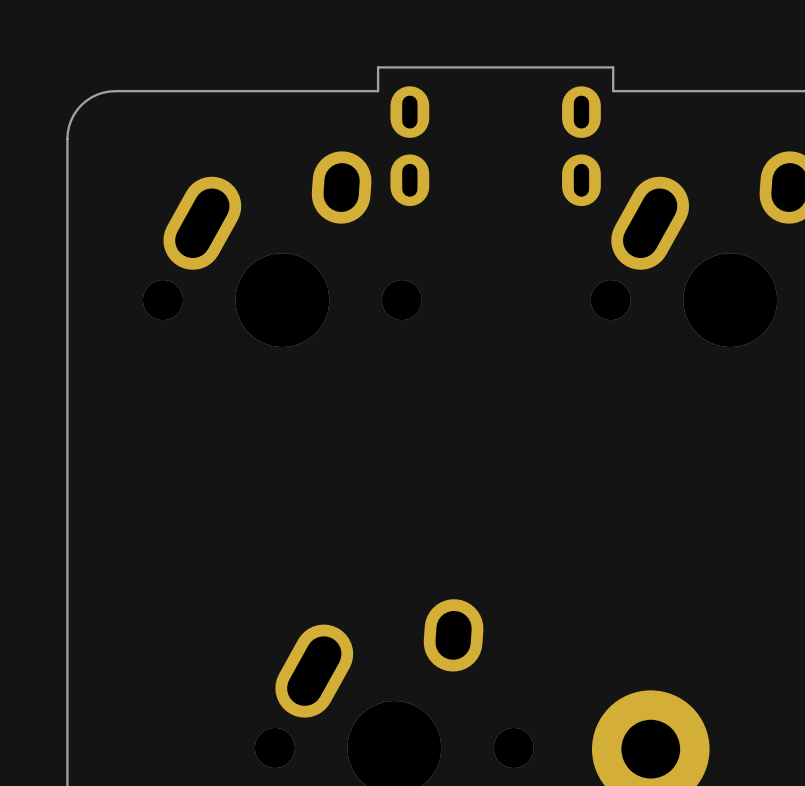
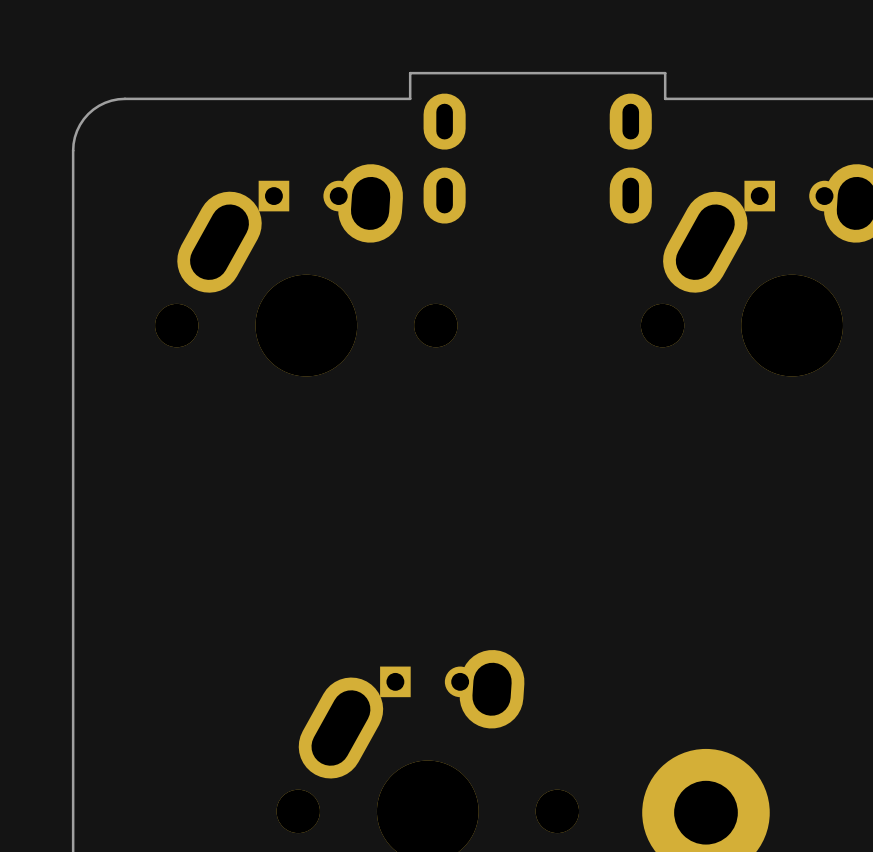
part: none -> (306, 196)
part: none -> (792, 196)
part: none -> (427, 681)

